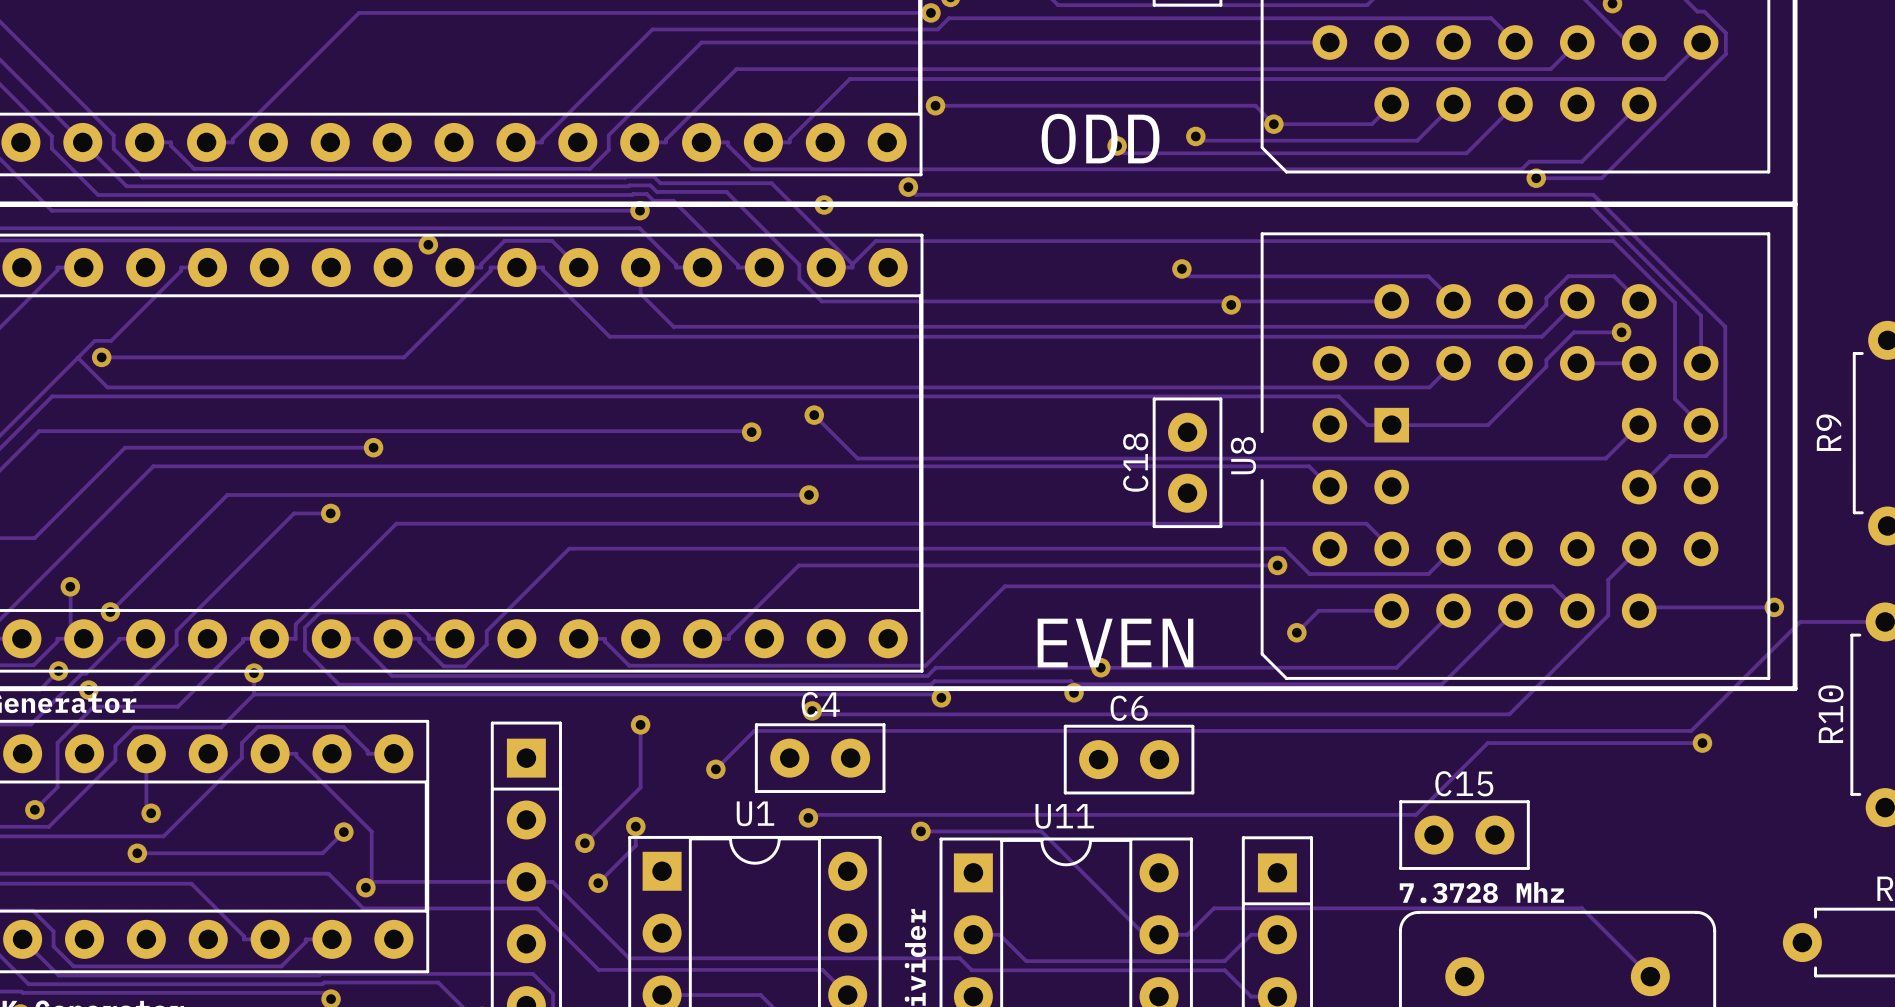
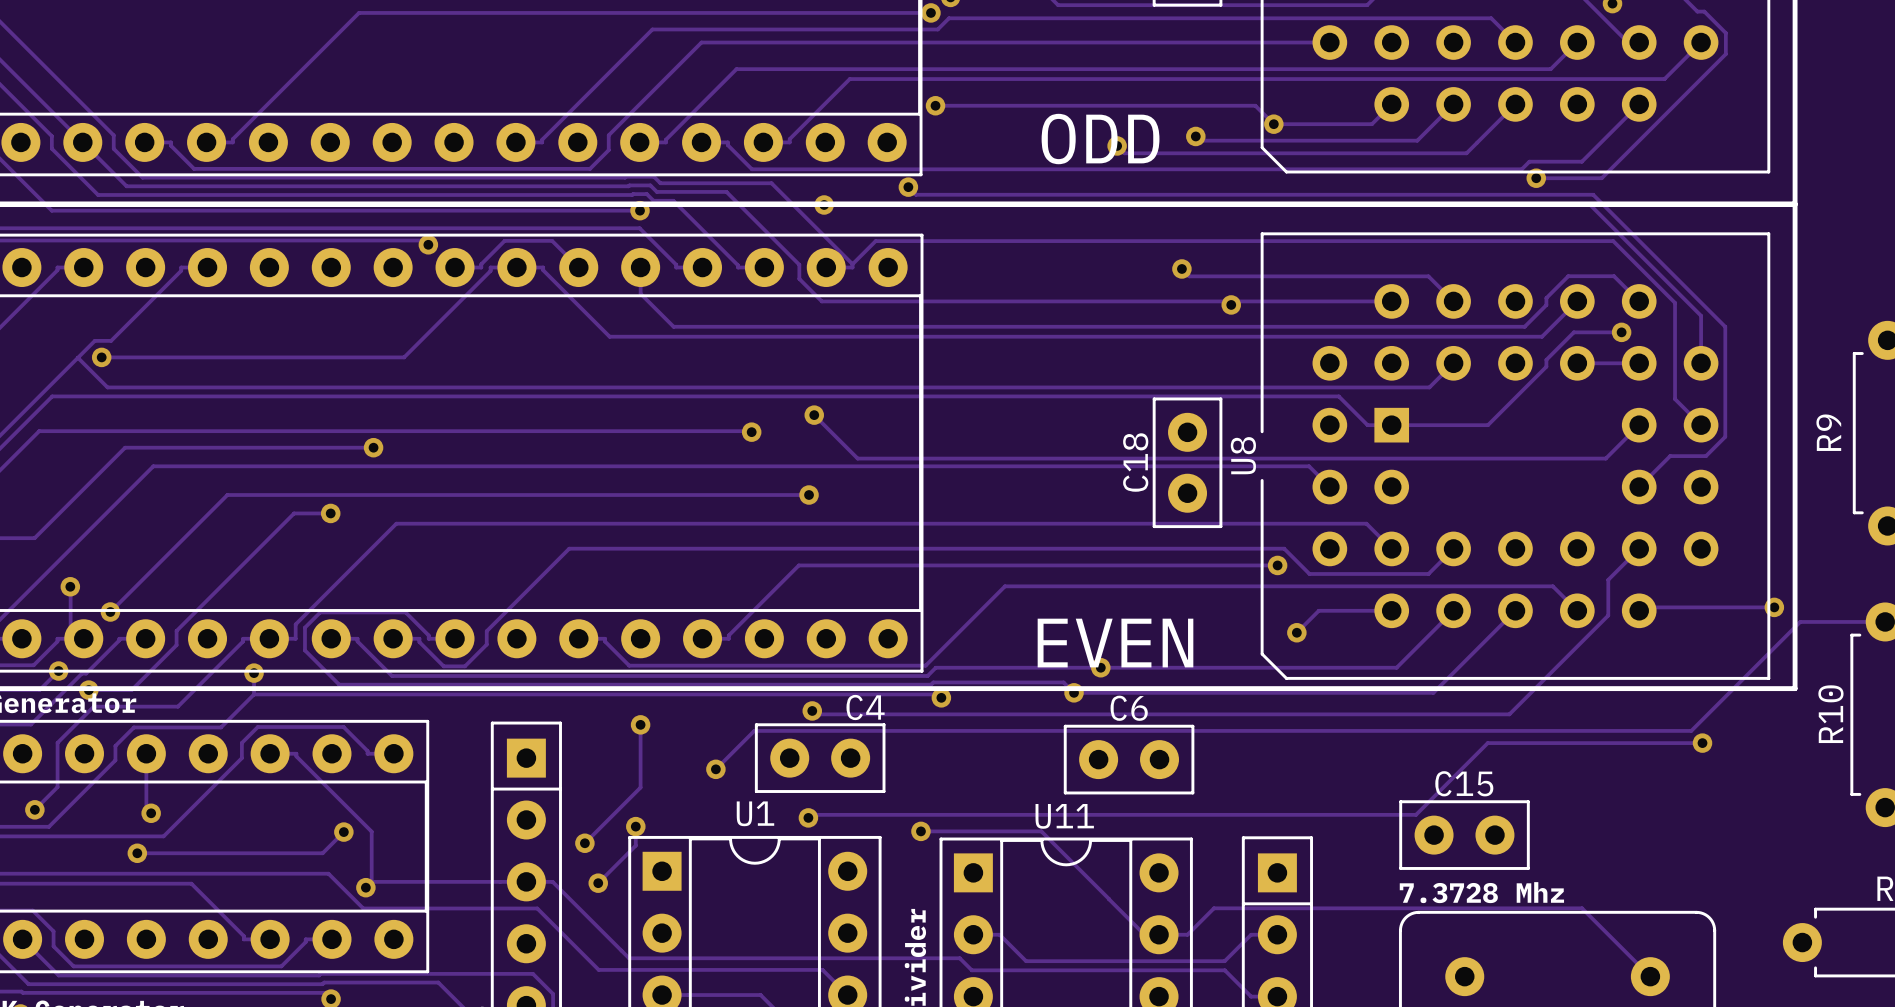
track: (933, 682) (1071, 681) (1074, 684) -> none
track: (1074, 684) (1441, 684) -> (933, 682) (1063, 682) (1074, 692) (1433, 692) (1441, 684)
C4 name position: C4 (820, 704) -> C4 (865, 707)

